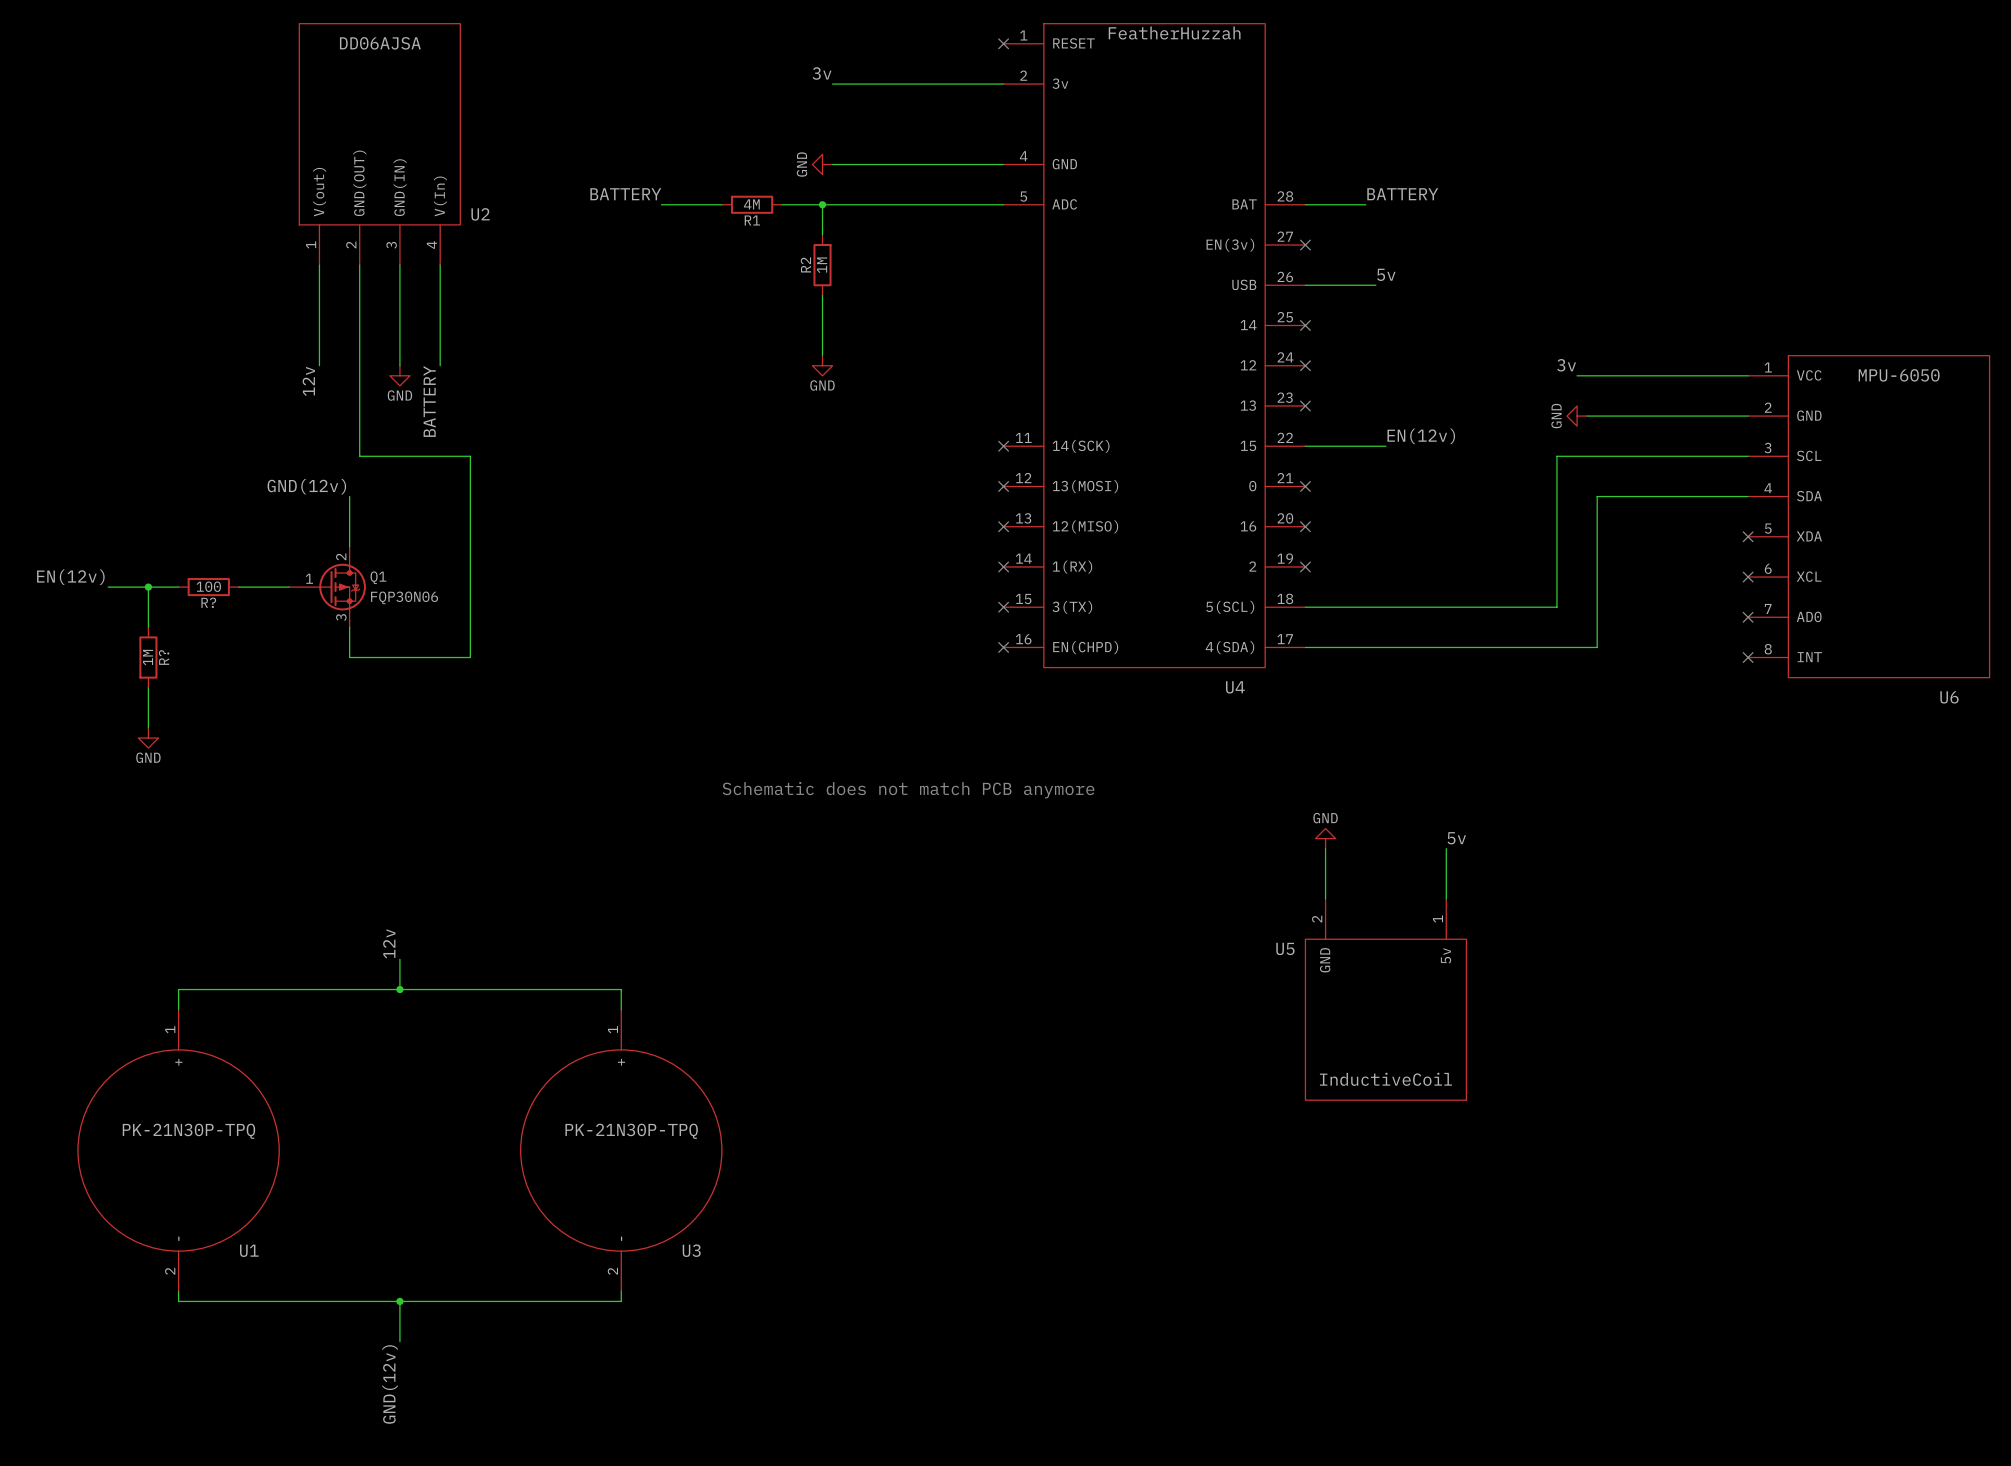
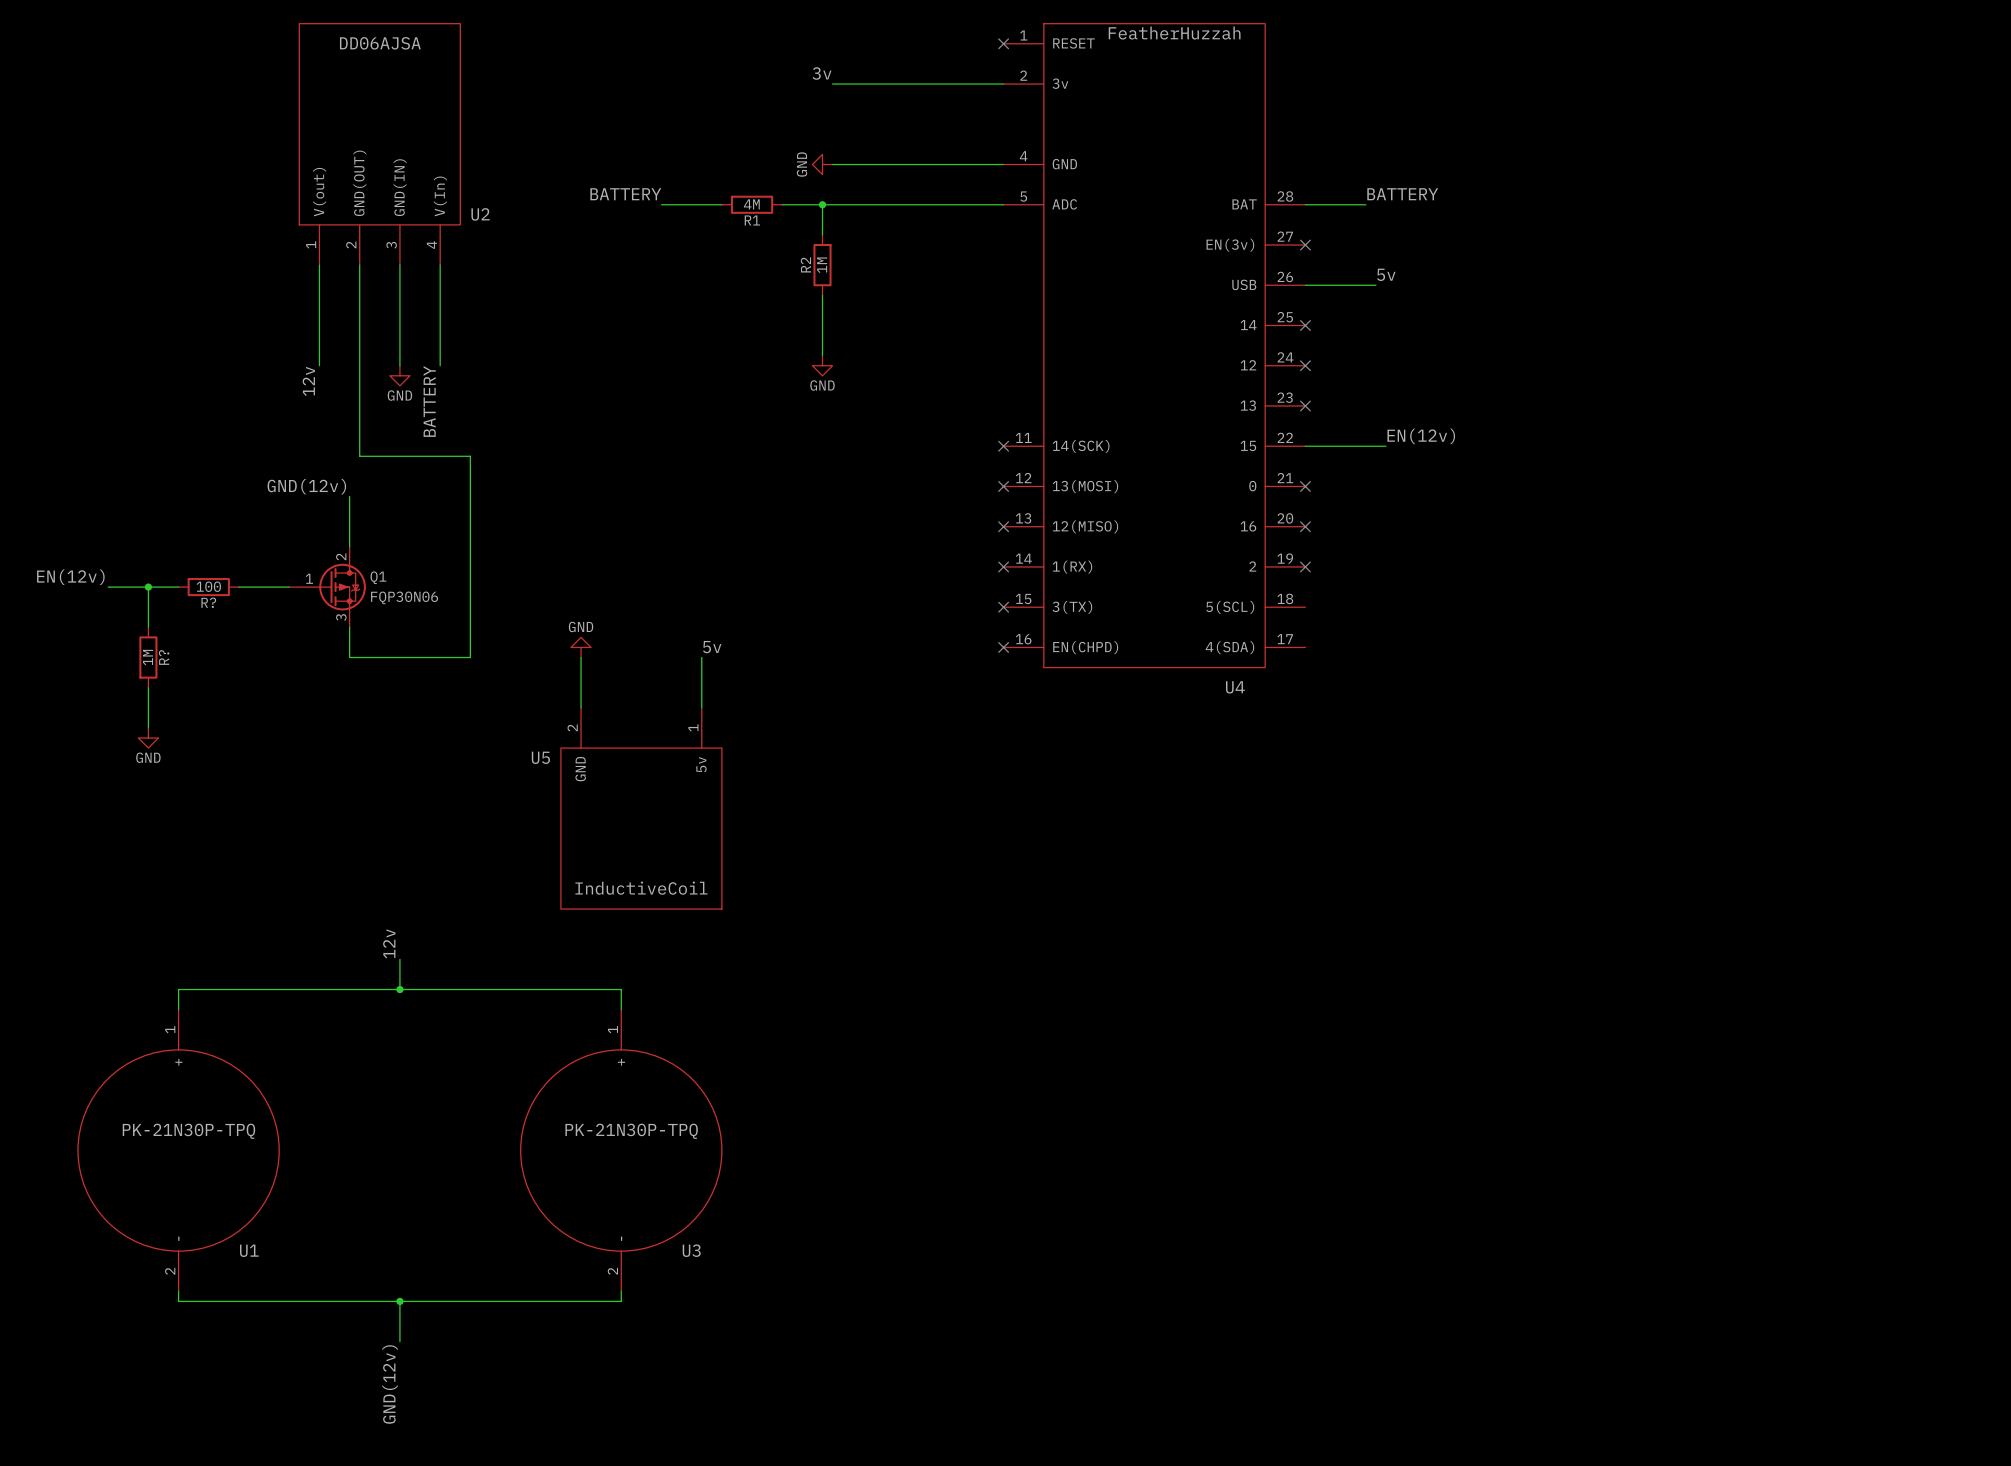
label: 3v (1566, 365) -> none
wire: (1577, 375) (1748, 375) -> none
power symbol: GND (1577, 416) -> none
wire: (1587, 416) (1748, 416) -> none
wire: (1748, 456) (1556, 456) (1556, 607) (1305, 607) -> none
wire: (1748, 496) (1597, 496) (1597, 647) (1305, 647) -> none
U6: MPU-6050 (1868, 516) -> none
no-connect mark: (1748, 536) -> none
no-connect mark: (1748, 577) -> none
no-connect mark: (1748, 617) -> none
power symbol: none -> GND (581, 647)
label: none -> 5v (712, 647)
wire: none -> (581, 657) (581, 707)
wire: none -> (701, 657) (701, 707)
no-connect mark: (1748, 657) -> none
text: Schematic does not match PCB anymore (908, 790) -> none
power symbol: GND (1325, 838) -> none
label: 5v (1456, 838) -> none
wire: (1325, 848) (1325, 898) -> none
wire: (1446, 848) (1446, 898) -> none
U5 position: (1385, 999) -> (641, 808)

